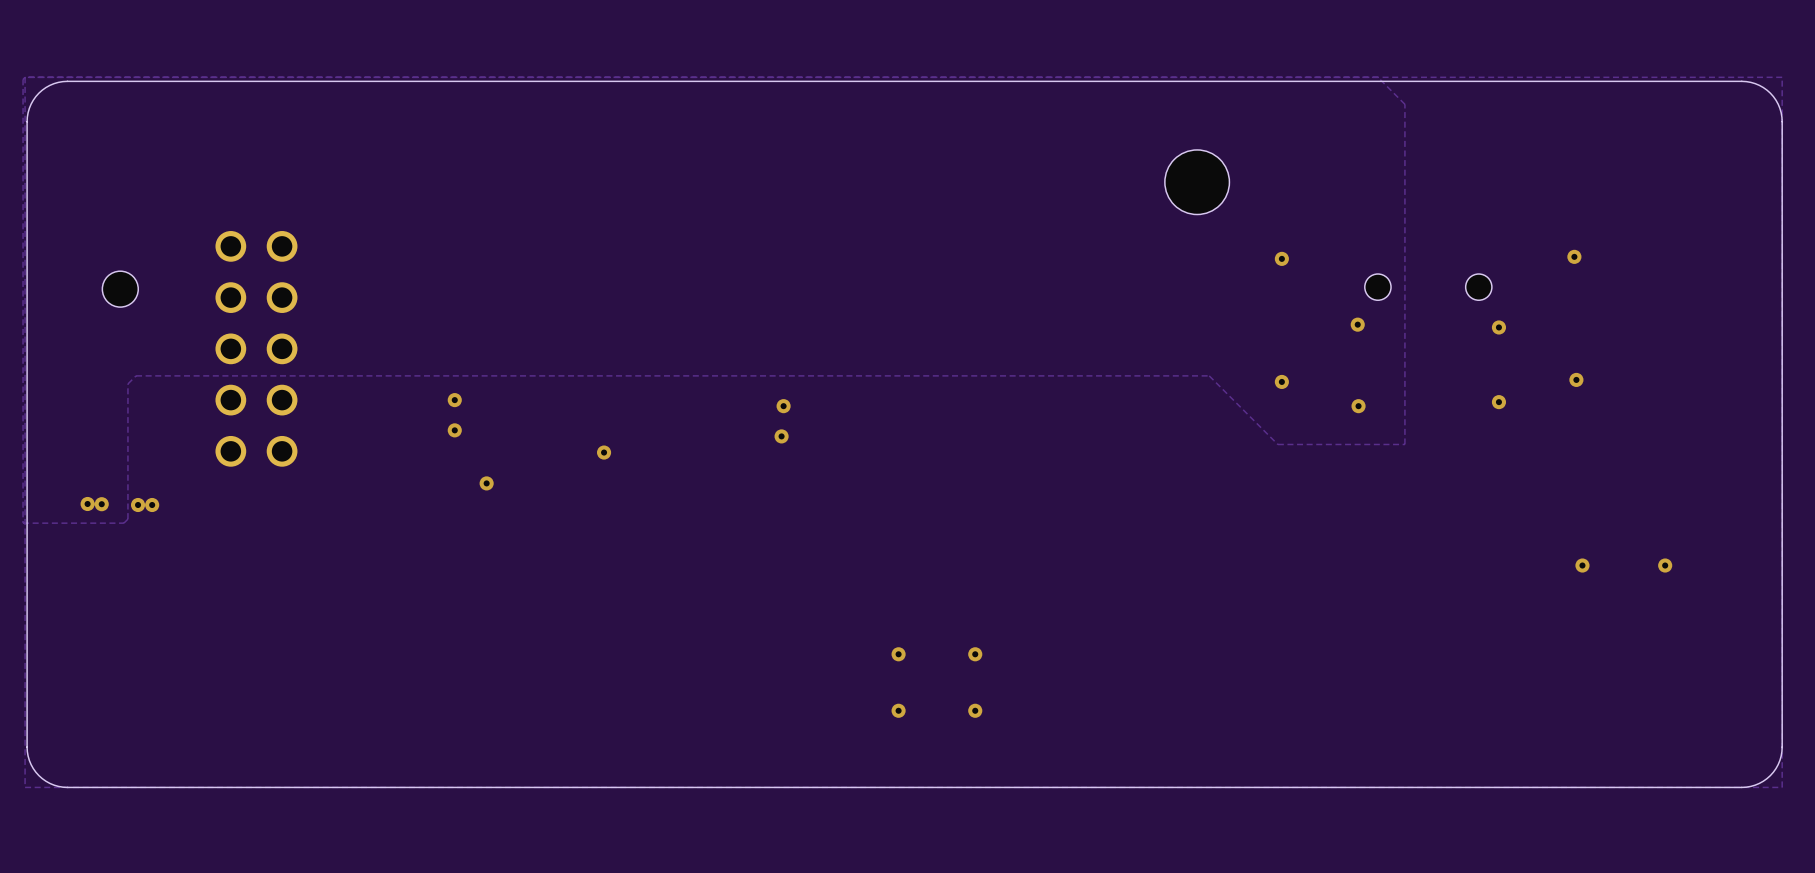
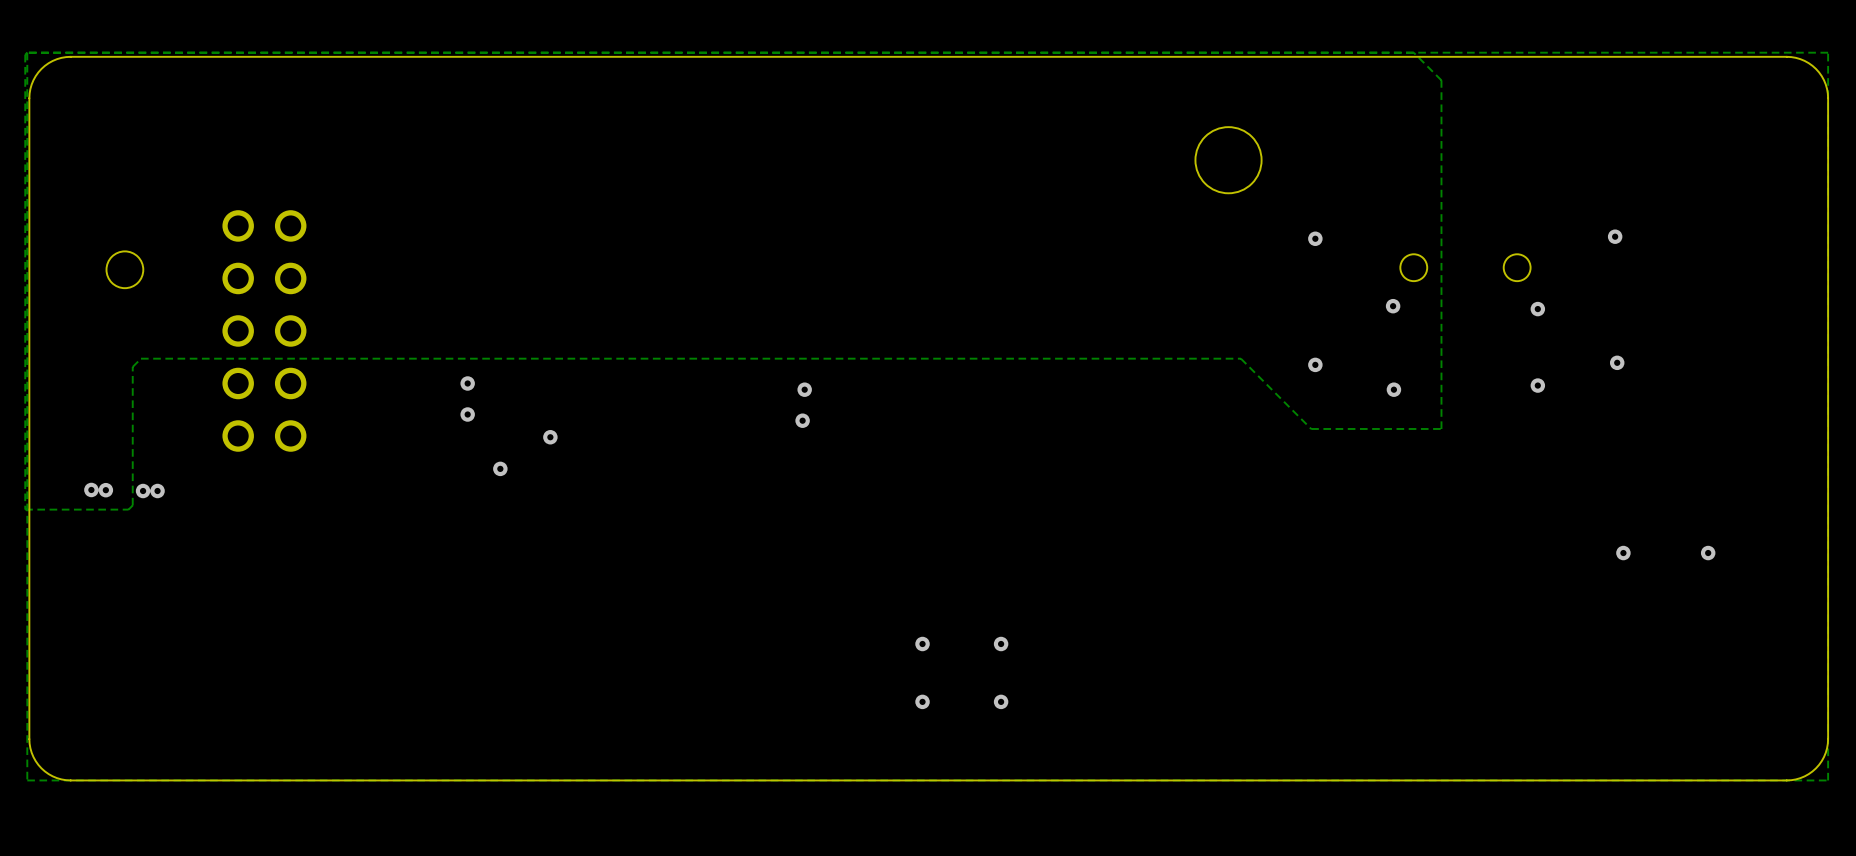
via position: (604, 452) -> (550, 437)

